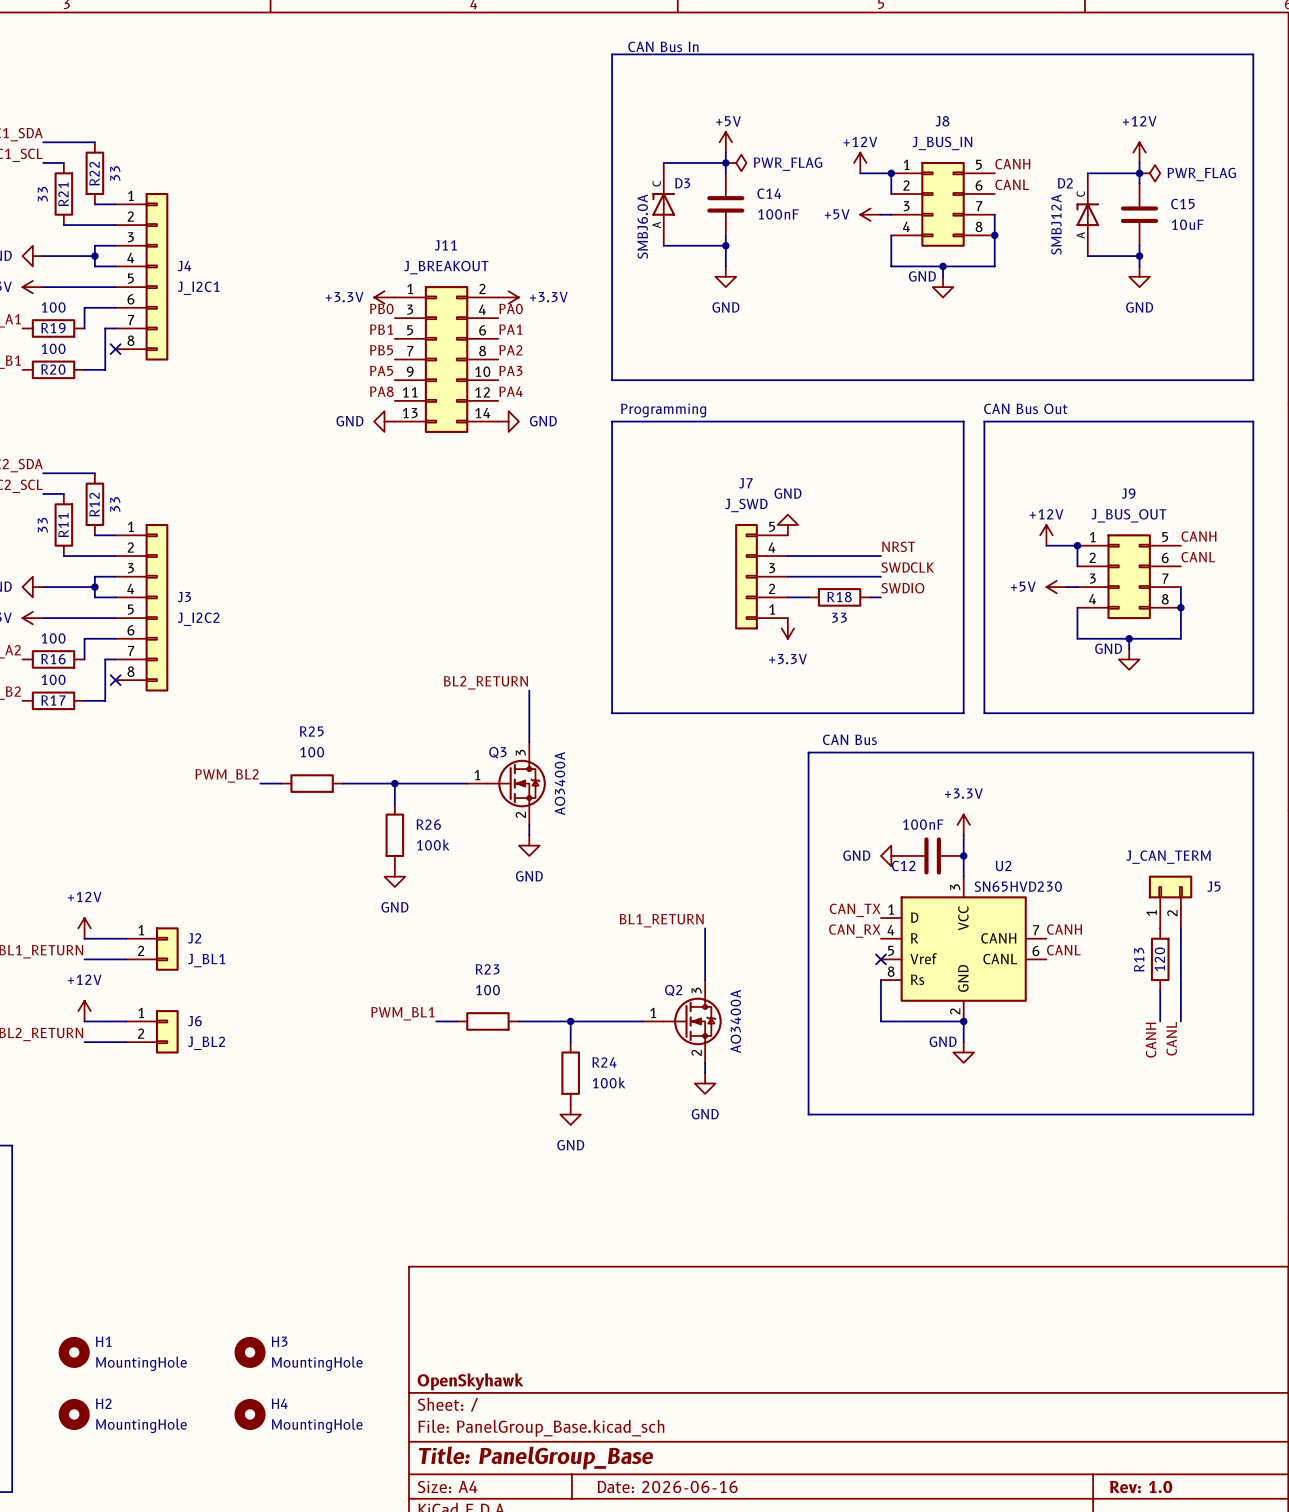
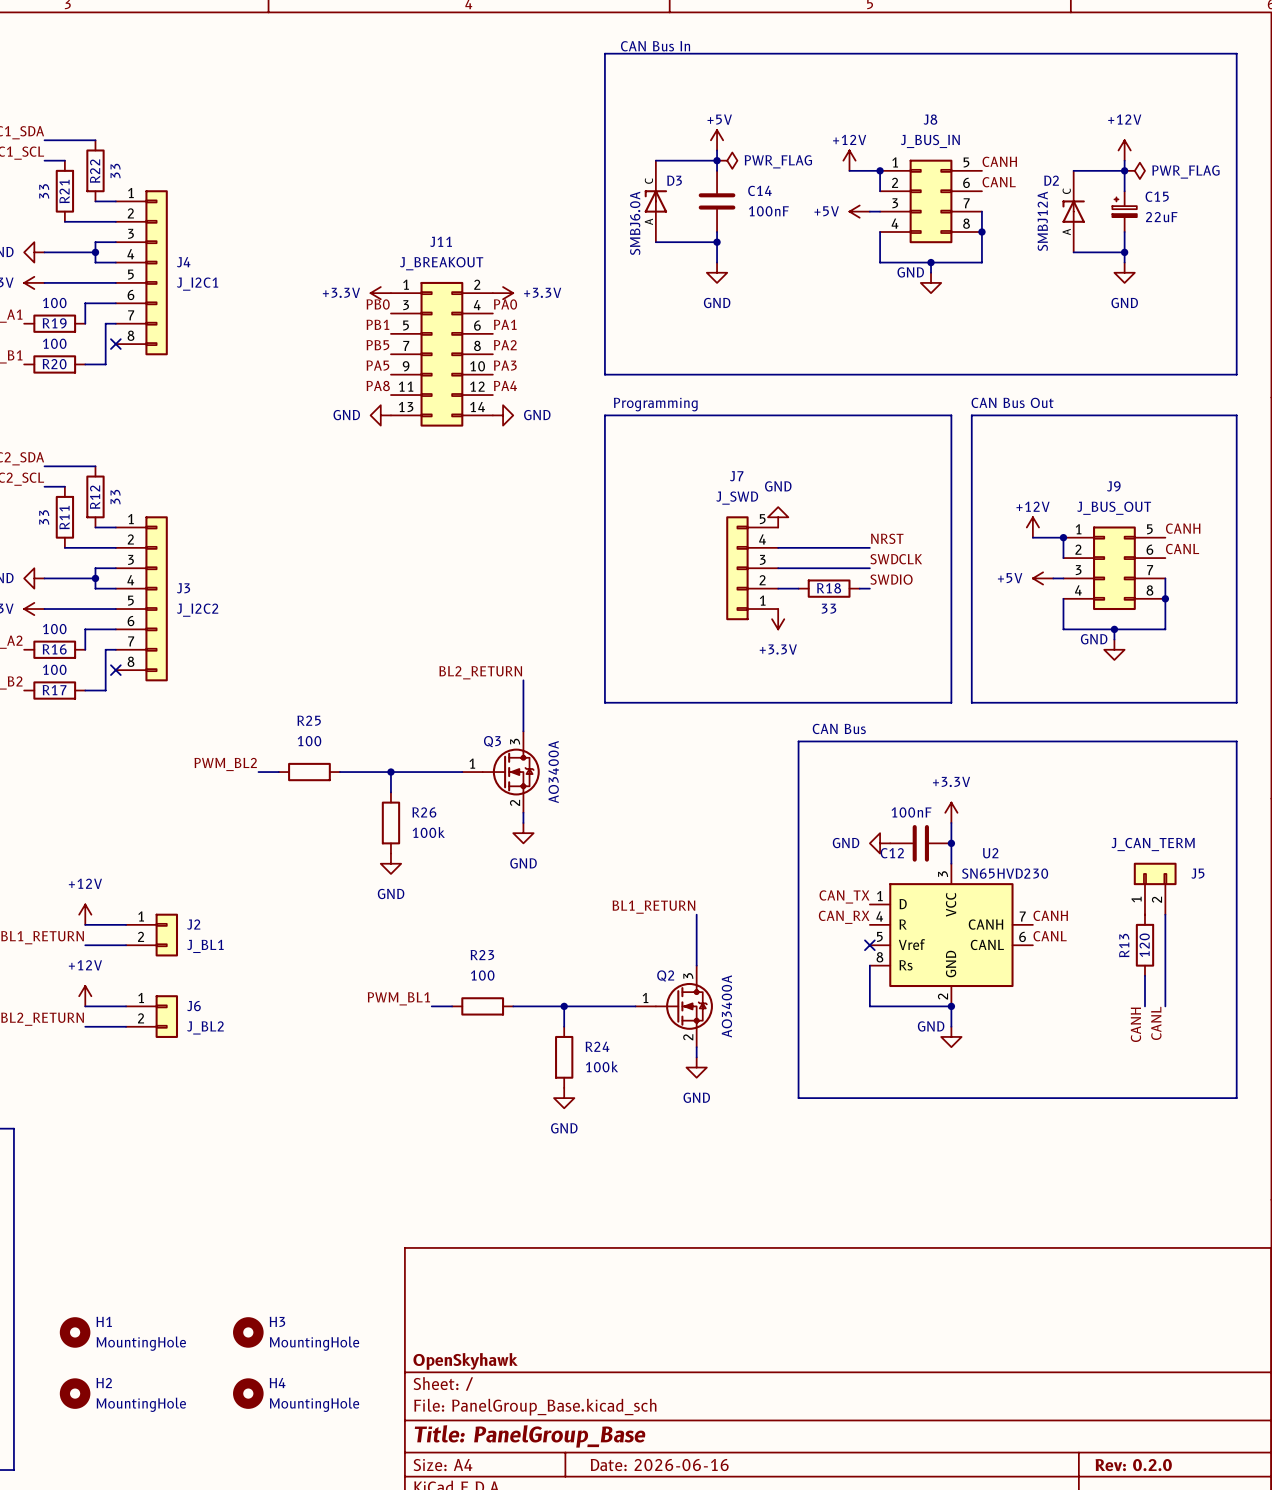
C15 symbol: [1120, 183, 1159, 246] -> [1112, 191, 1137, 232]
C15 value: 10uF (1187, 224) -> 22uF (1161, 217)
title block: Rev: 1.0 (1141, 1487) -> Rev: 0.2.0 (1133, 1465)

